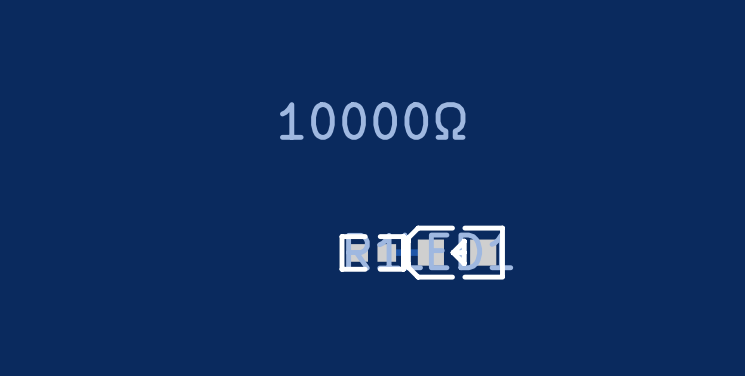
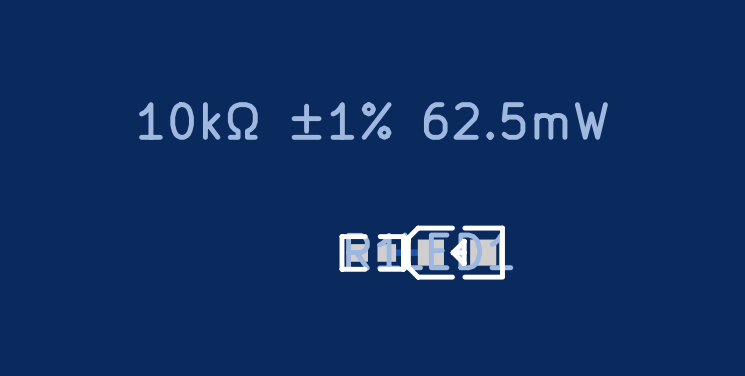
part value: 10000Ω (372, 120) -> 10kΩ ±1% 62.5mW (373, 120)

